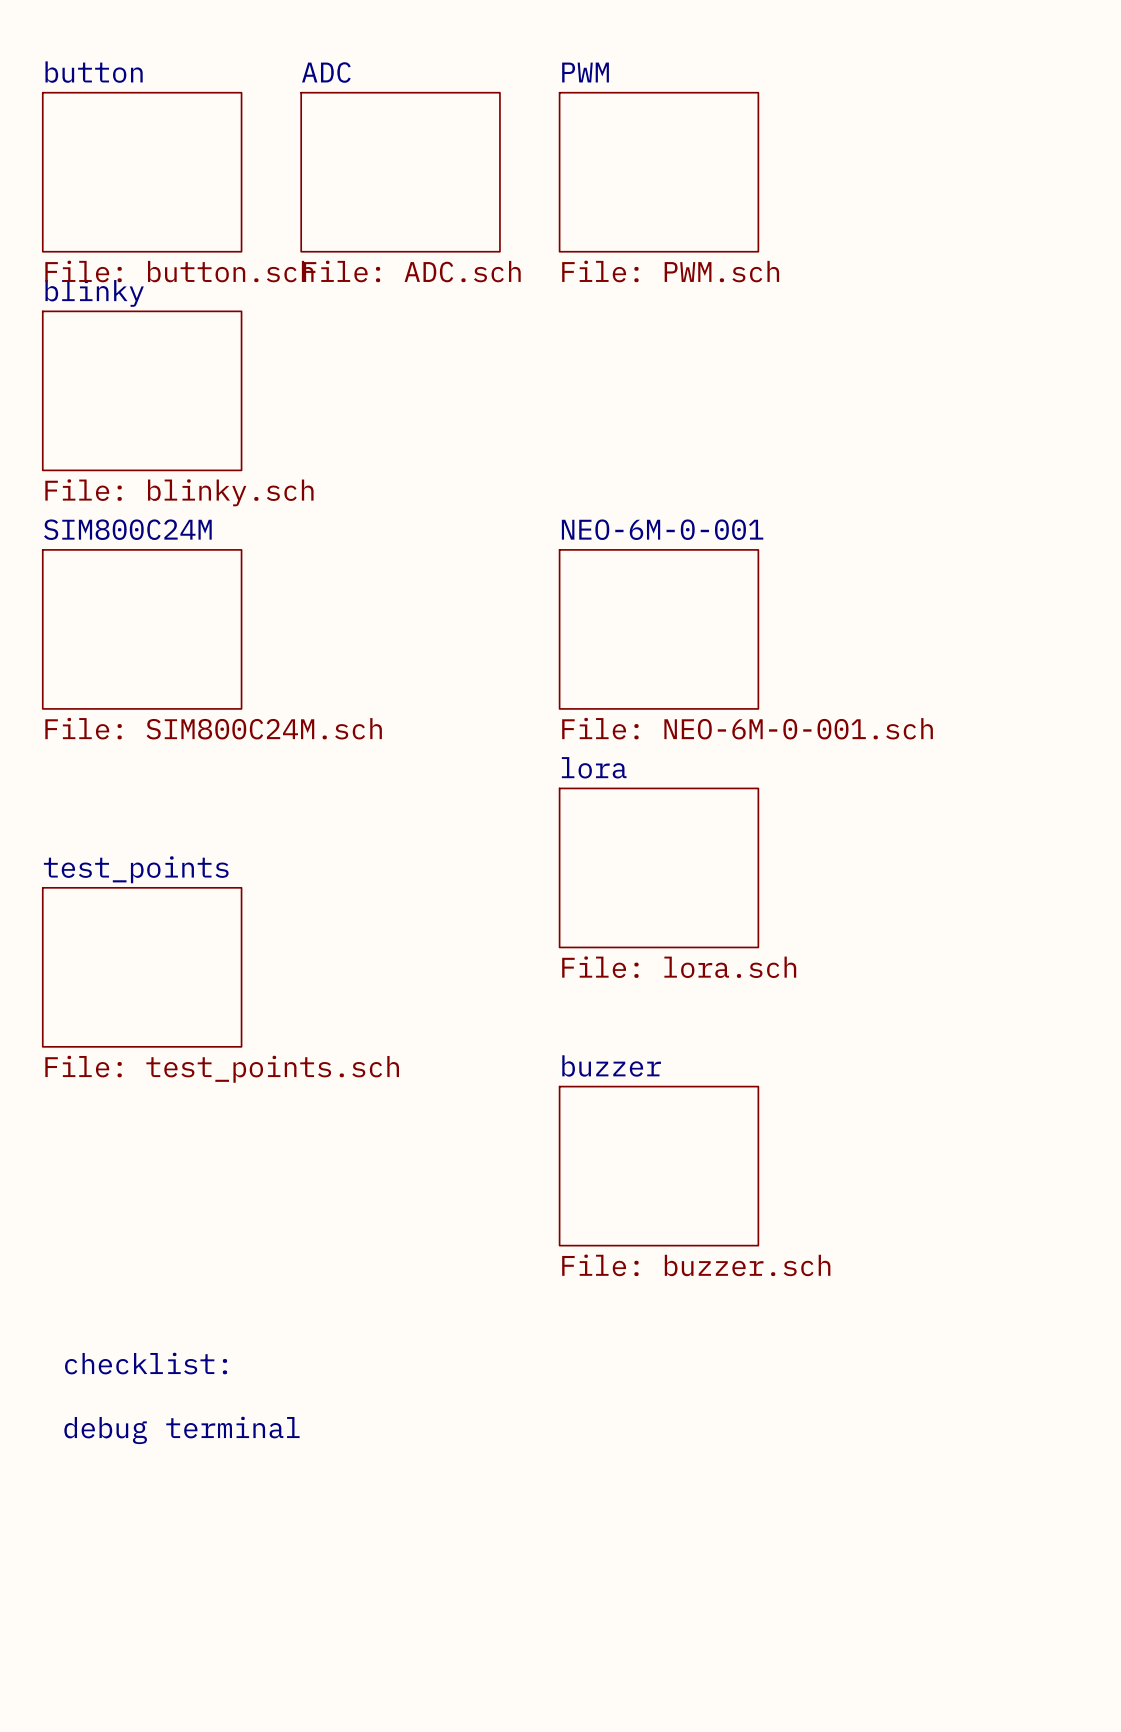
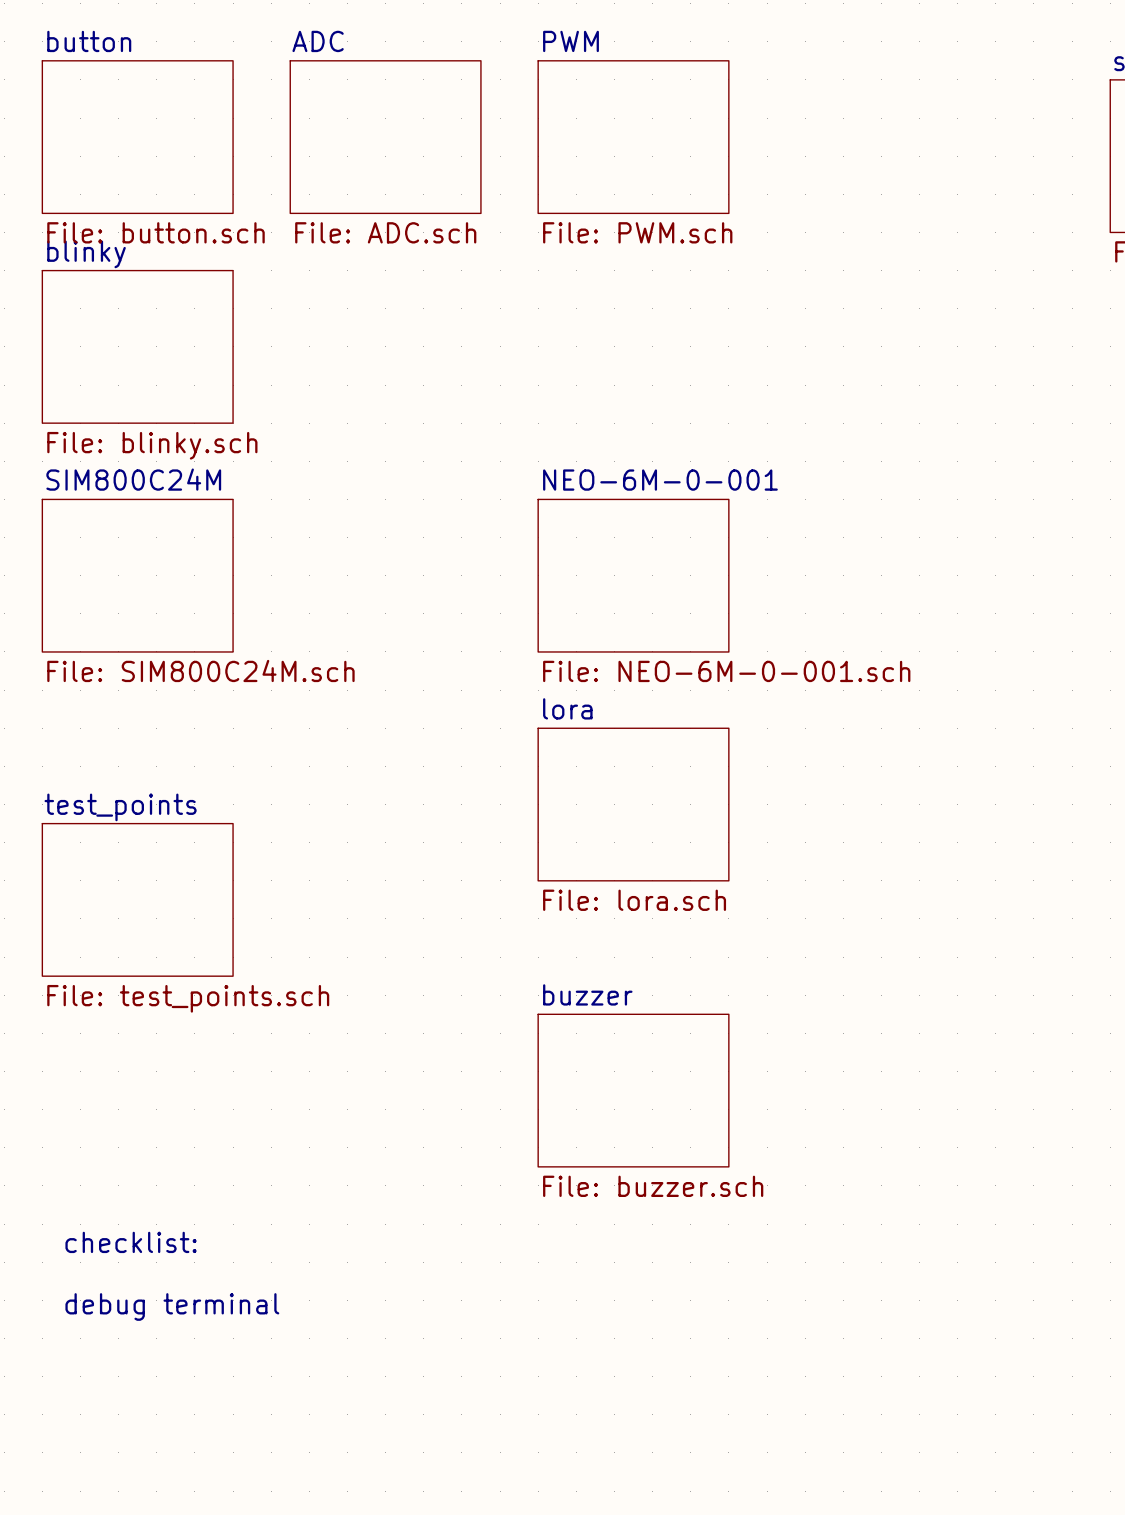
text position: checklist: (146, 1363) -> checklist: (131, 1242)
text position: debug terminal (181, 1430) -> debug terminal (172, 1306)

